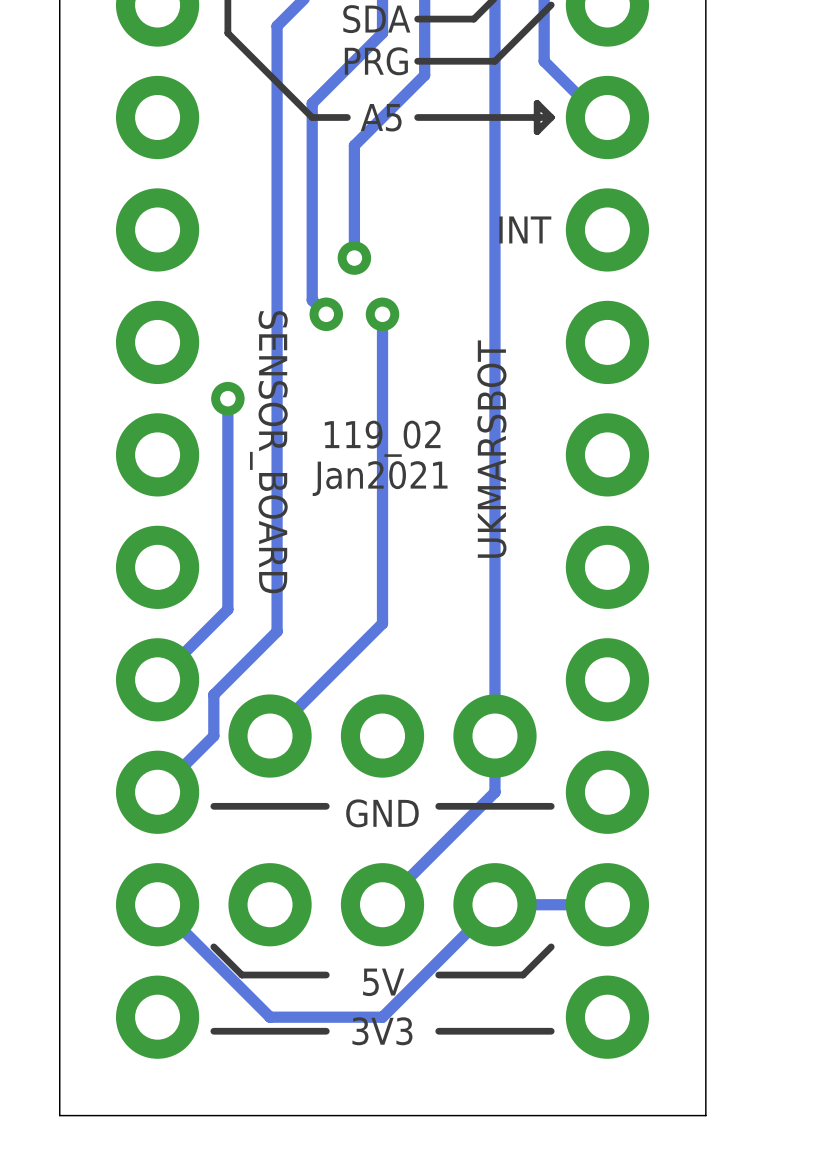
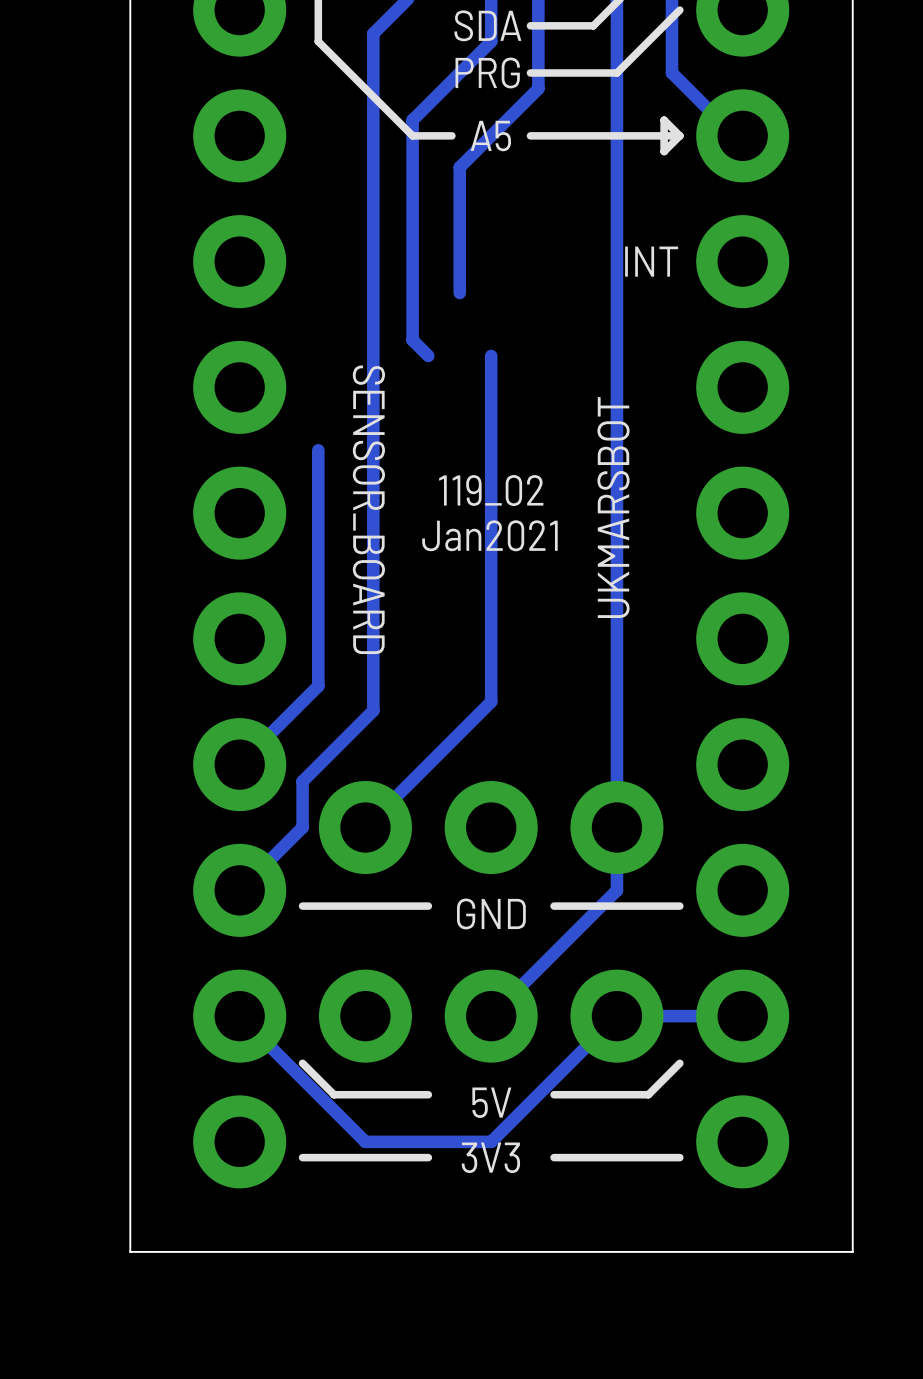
via: (354, 258) -> none
via: (326, 314) -> none
via: (382, 314) -> none
via: (227, 398) -> none

